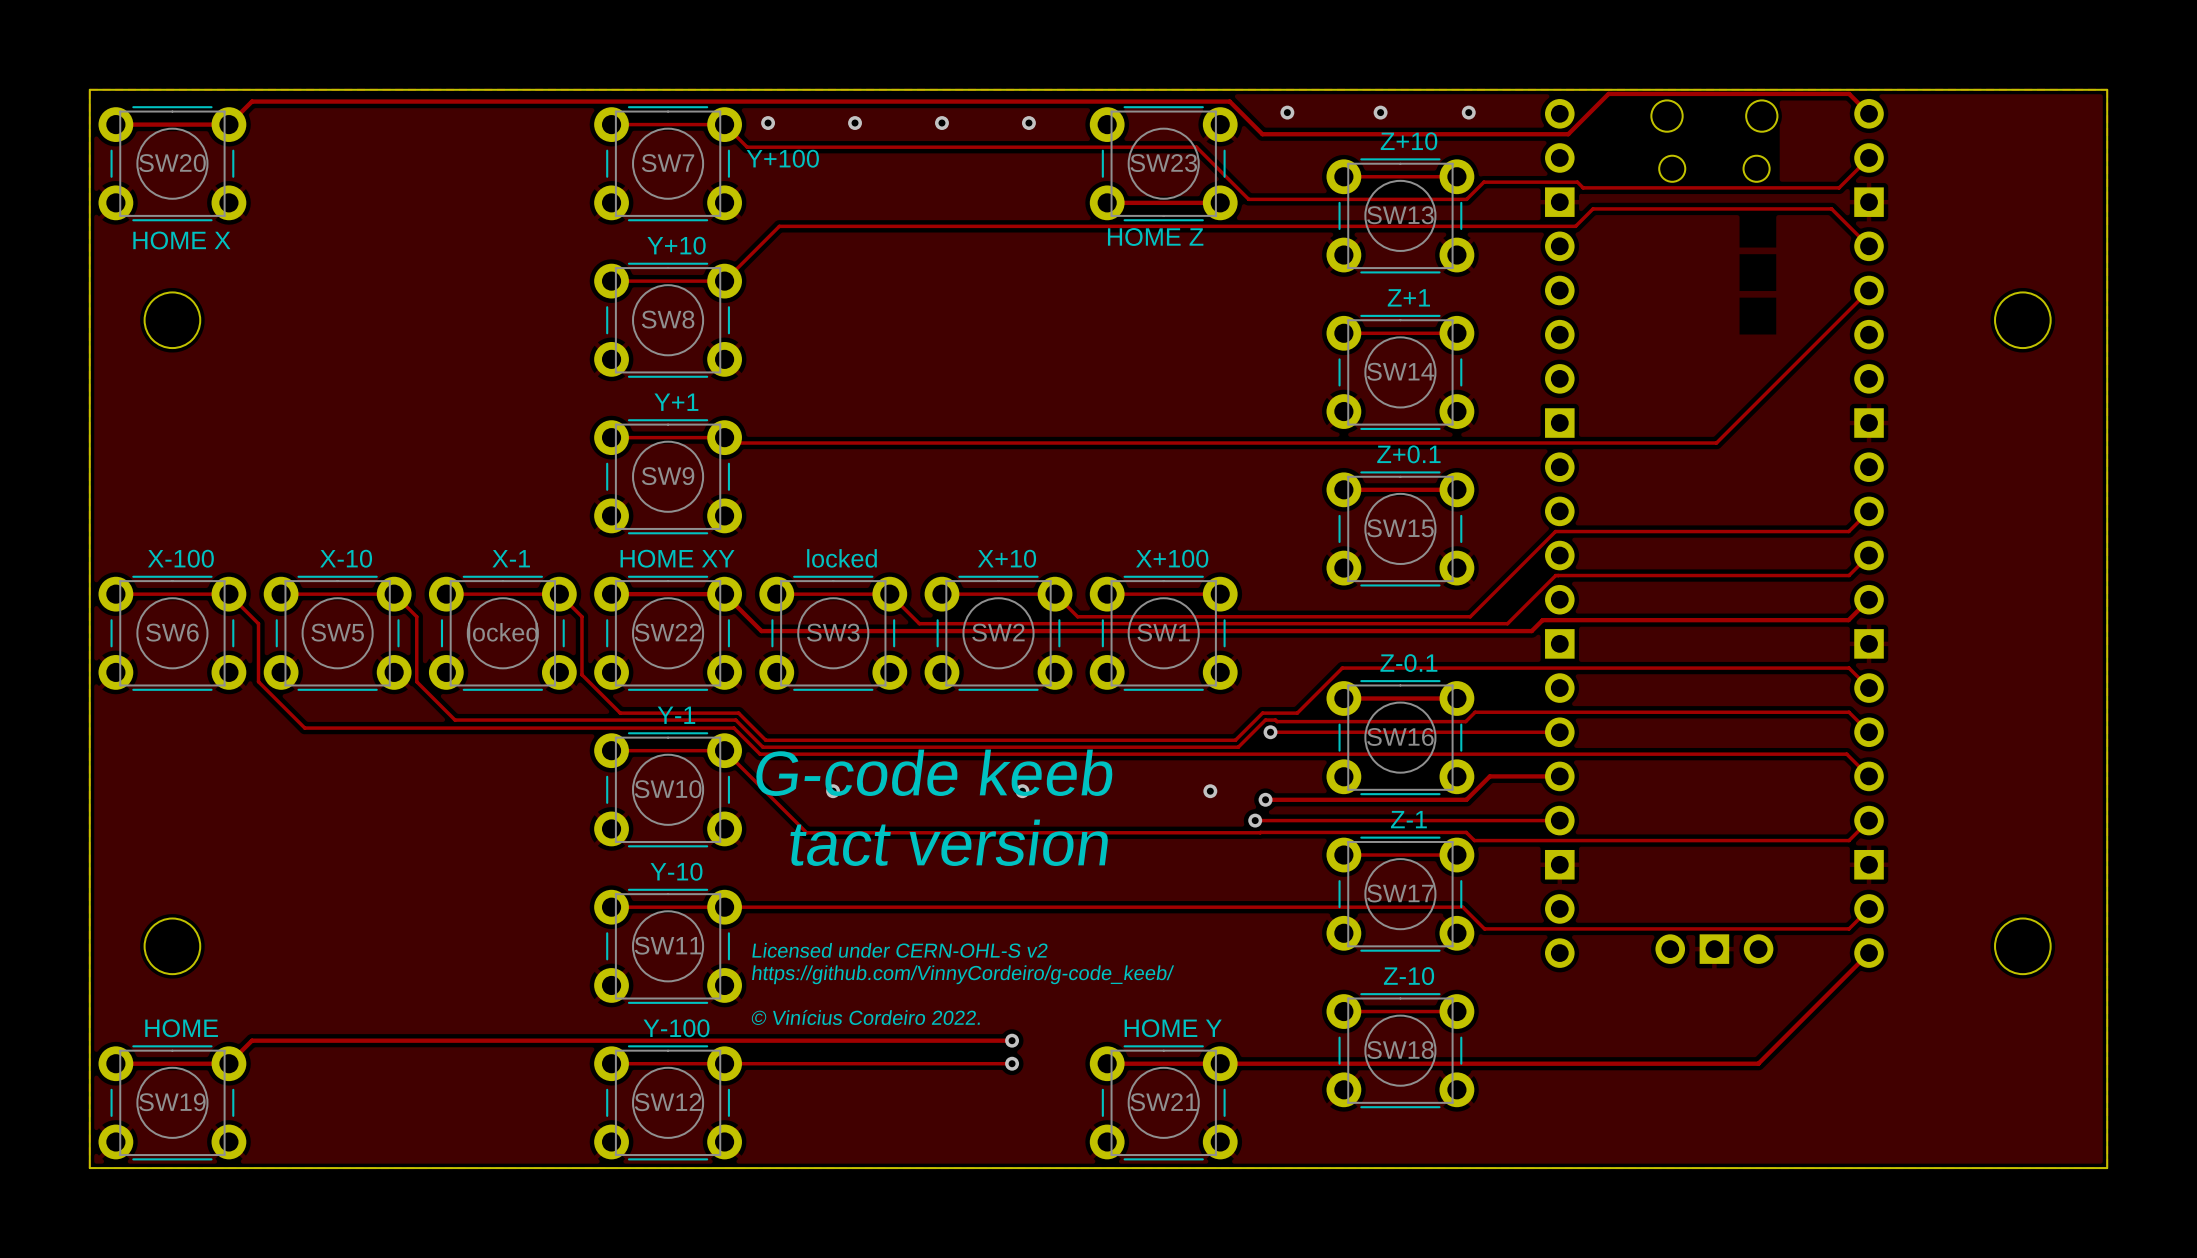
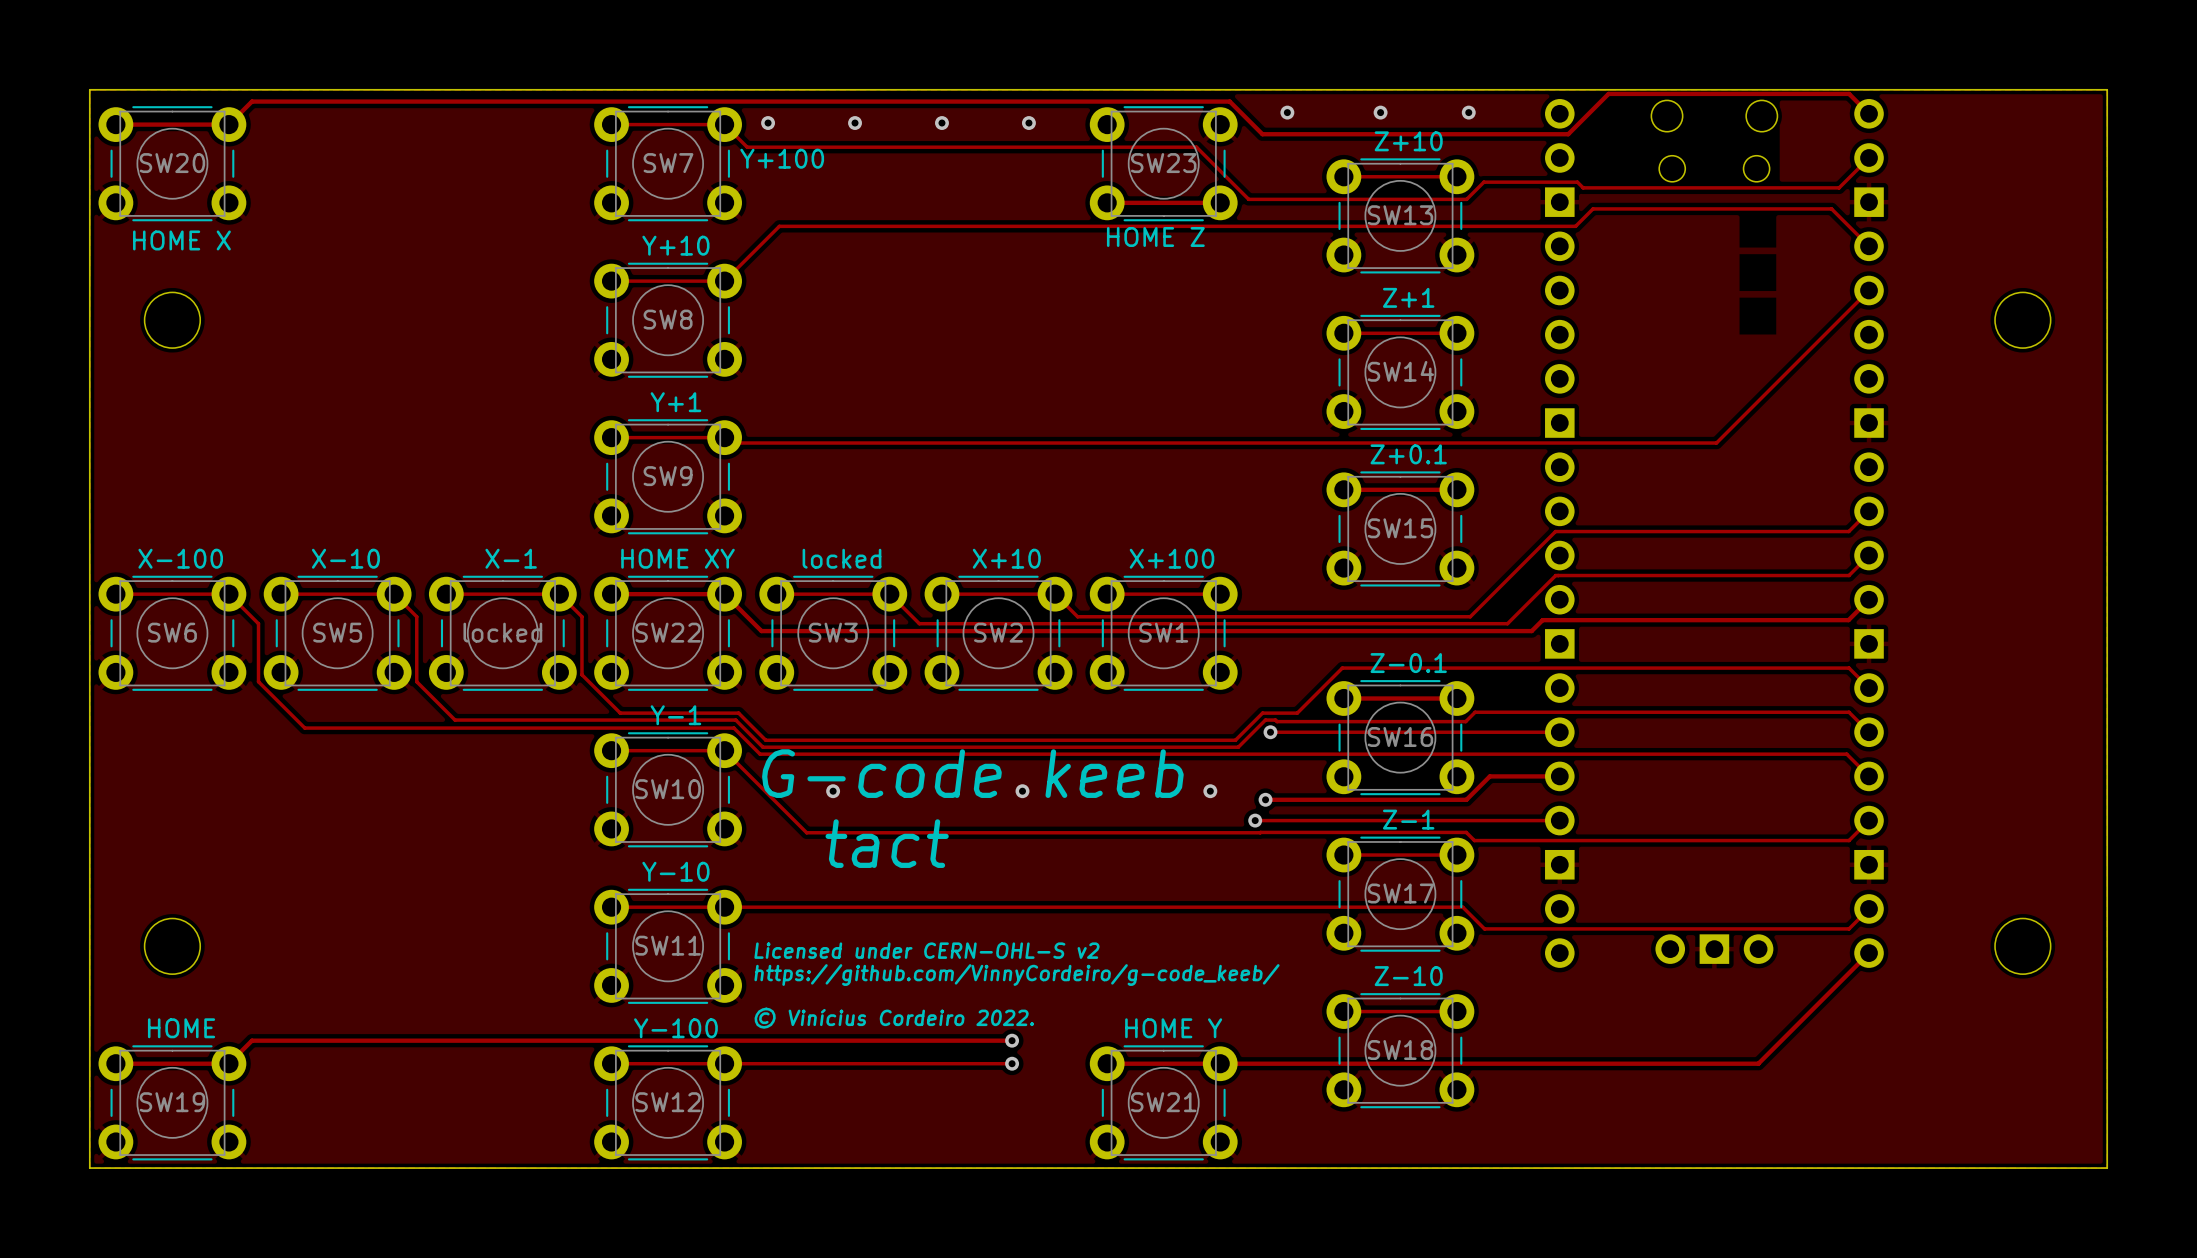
text: tact version (949, 842) -> tact (887, 843)

